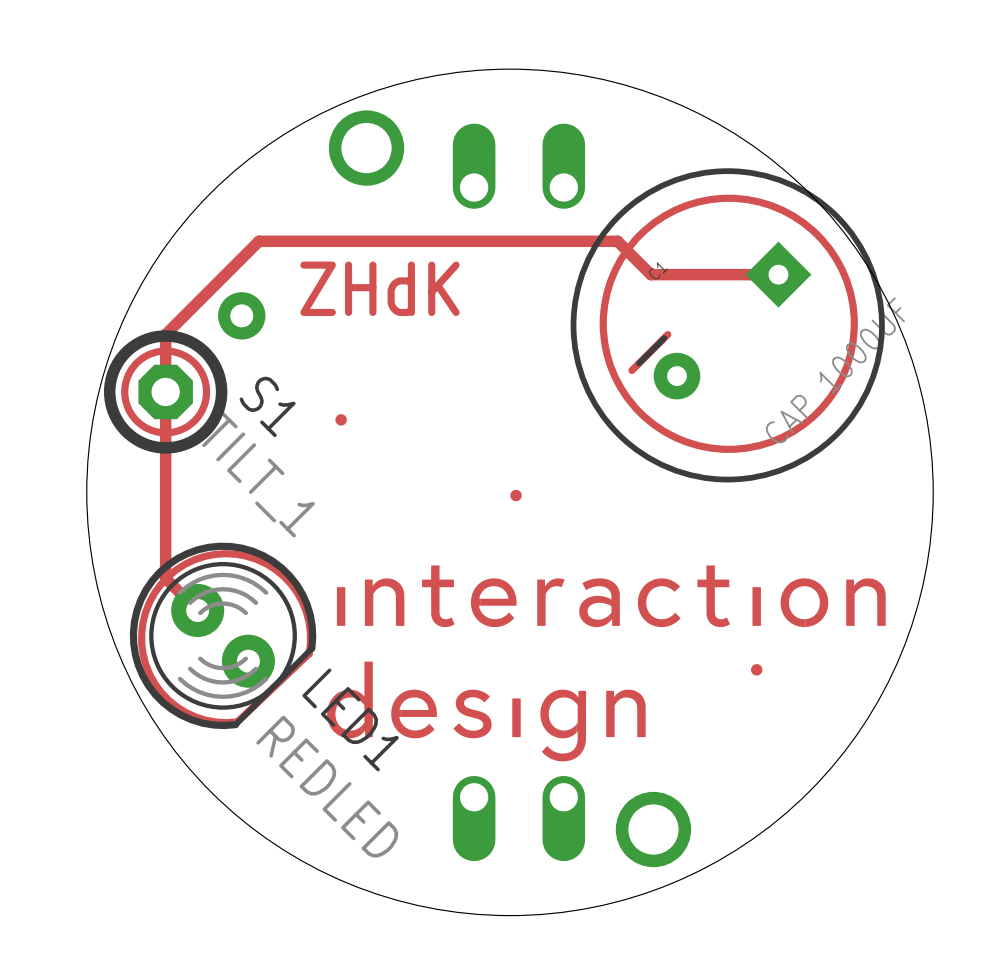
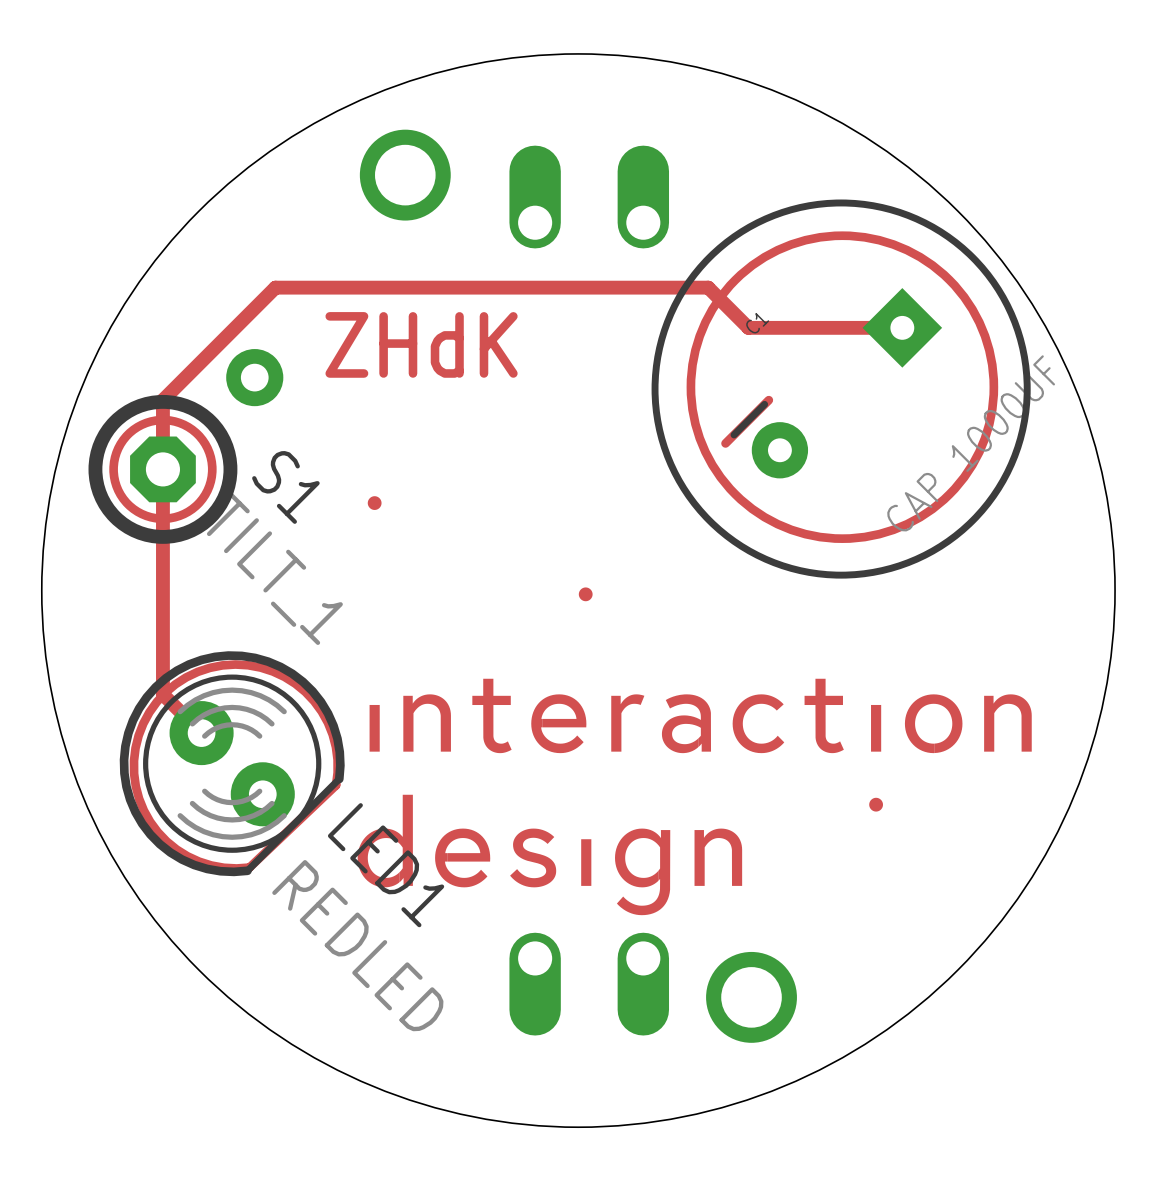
round board edge size: [86, 69, 934, 916] -> [41, 53, 1116, 1128]

